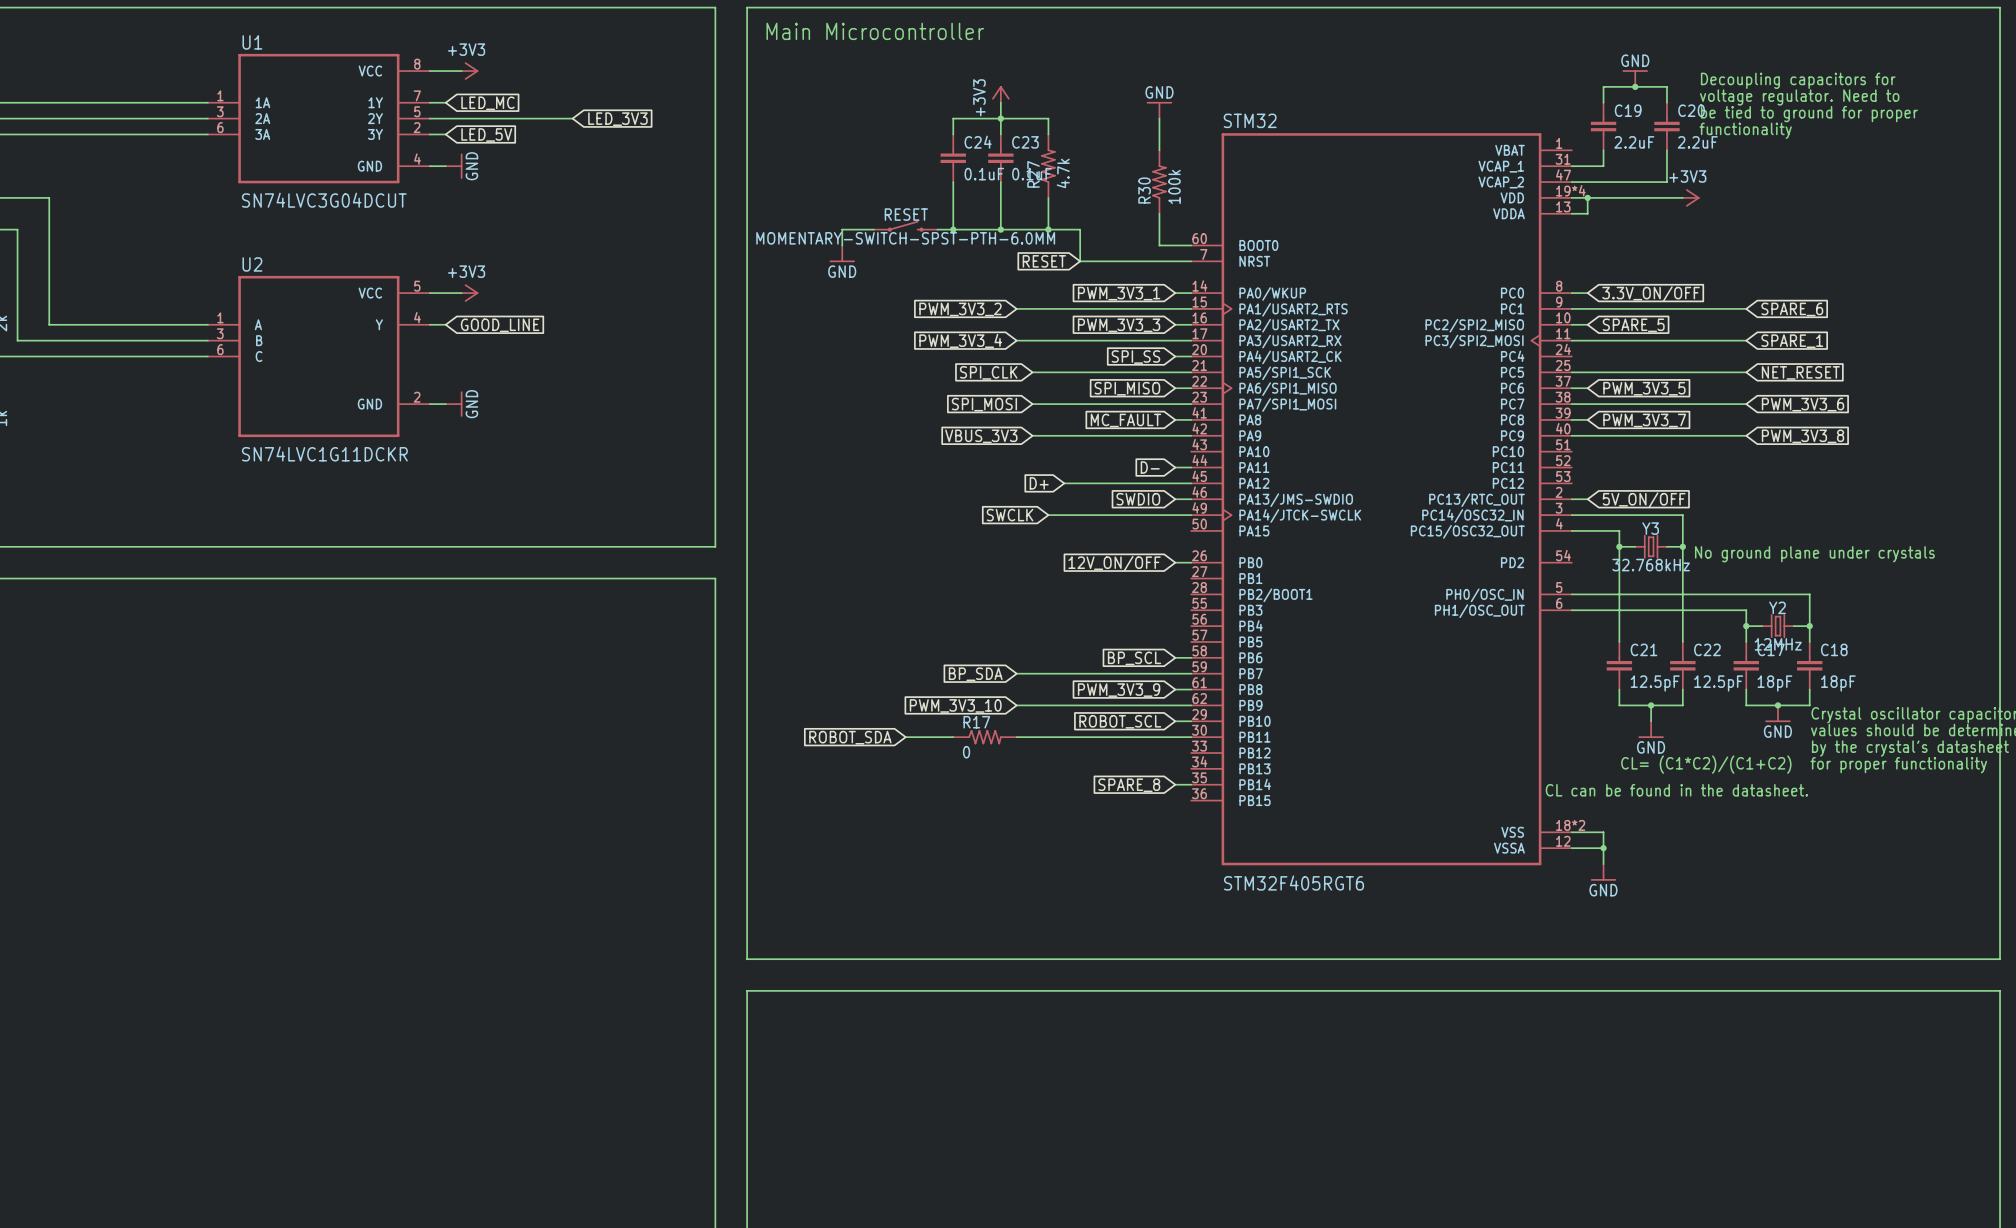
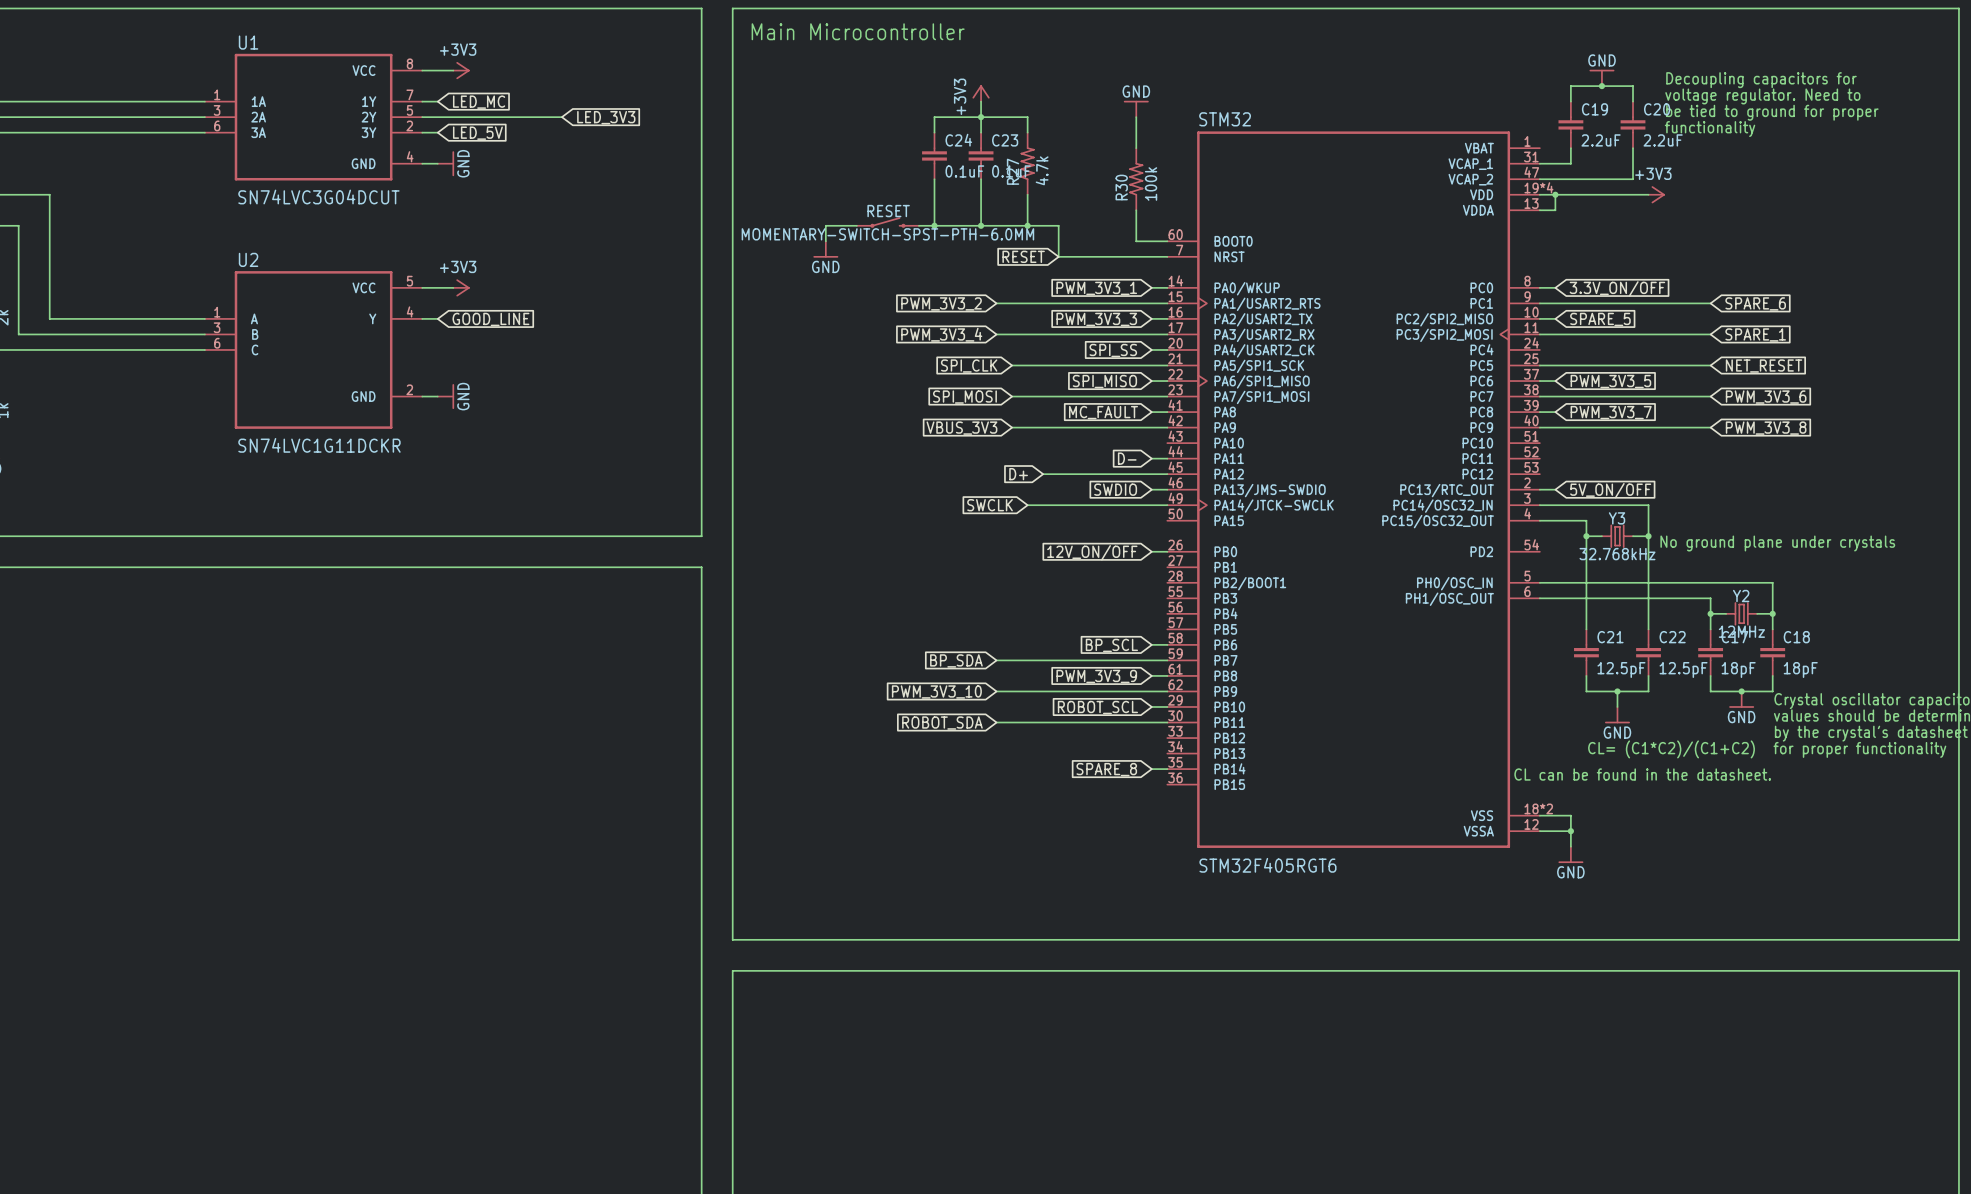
global label position: ROBOT_SDA (850, 737) -> ROBOT_SDA (942, 723)
wire: (905, 737) (953, 737) -> none
R17: 0 (984, 737) -> none

